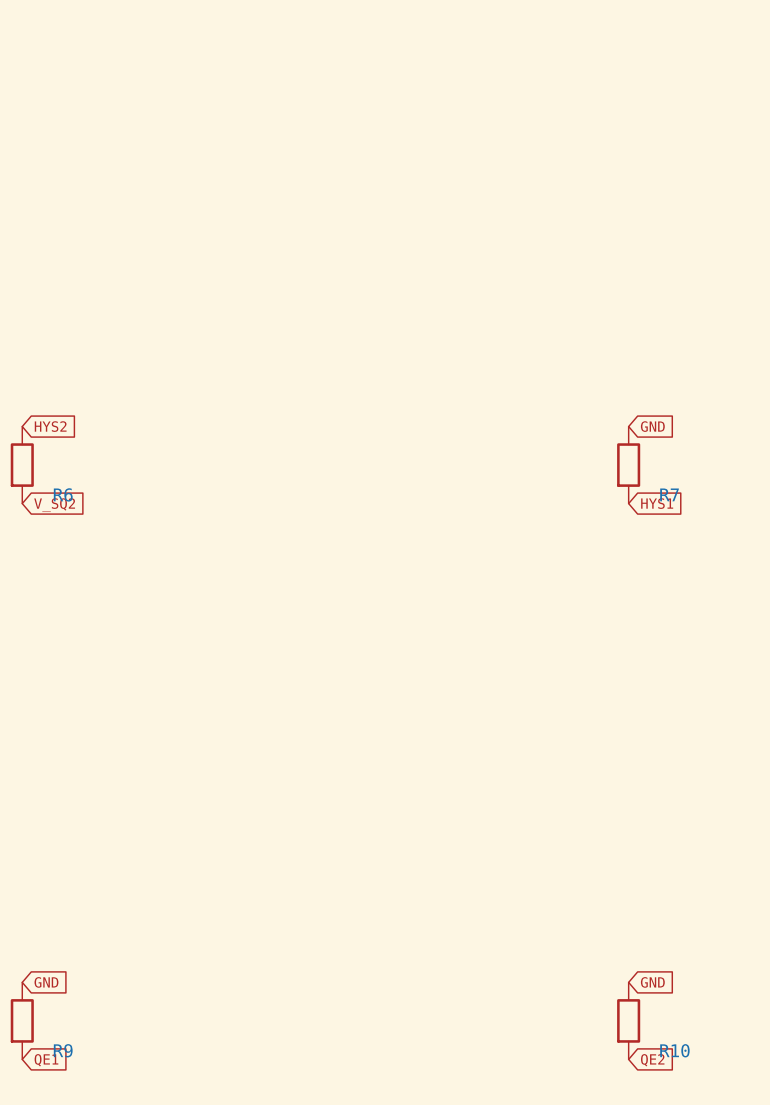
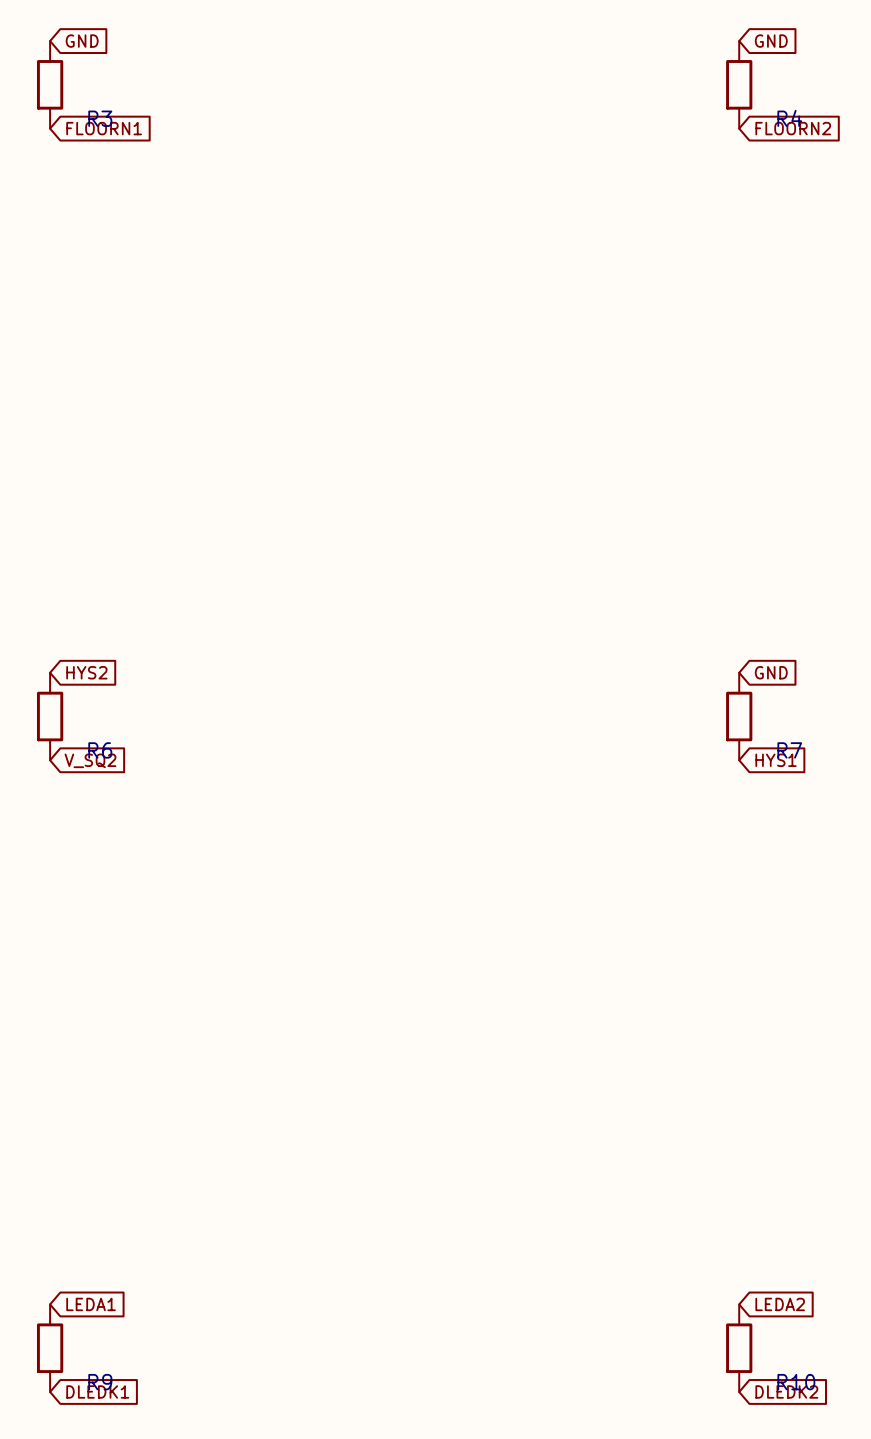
global label: GND (46, 982) -> LEDA1 (91, 1304)
global label: GND (652, 982) -> LEDA2 (780, 1304)
global label: QE1 (46, 1060) -> DLEDK1 (97, 1391)
global label: QE2 (652, 1060) -> DLEDK2 (786, 1391)

